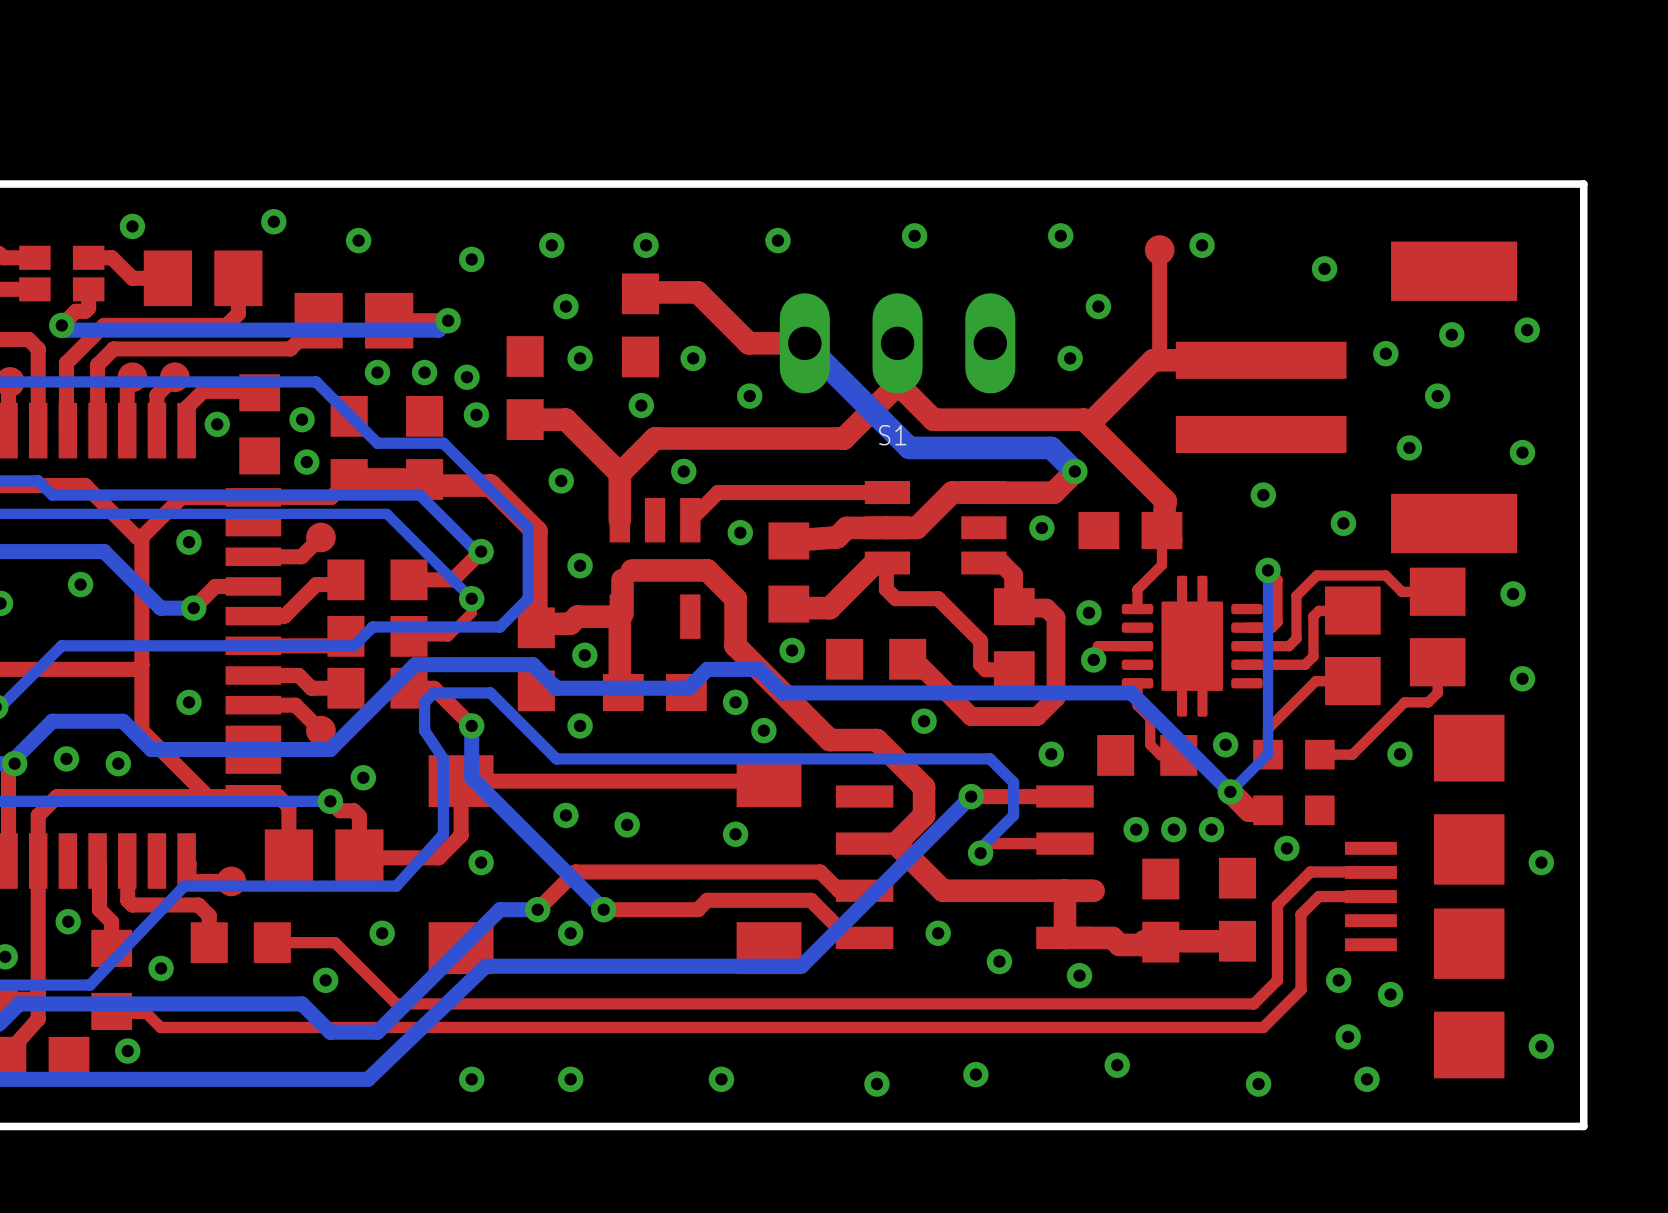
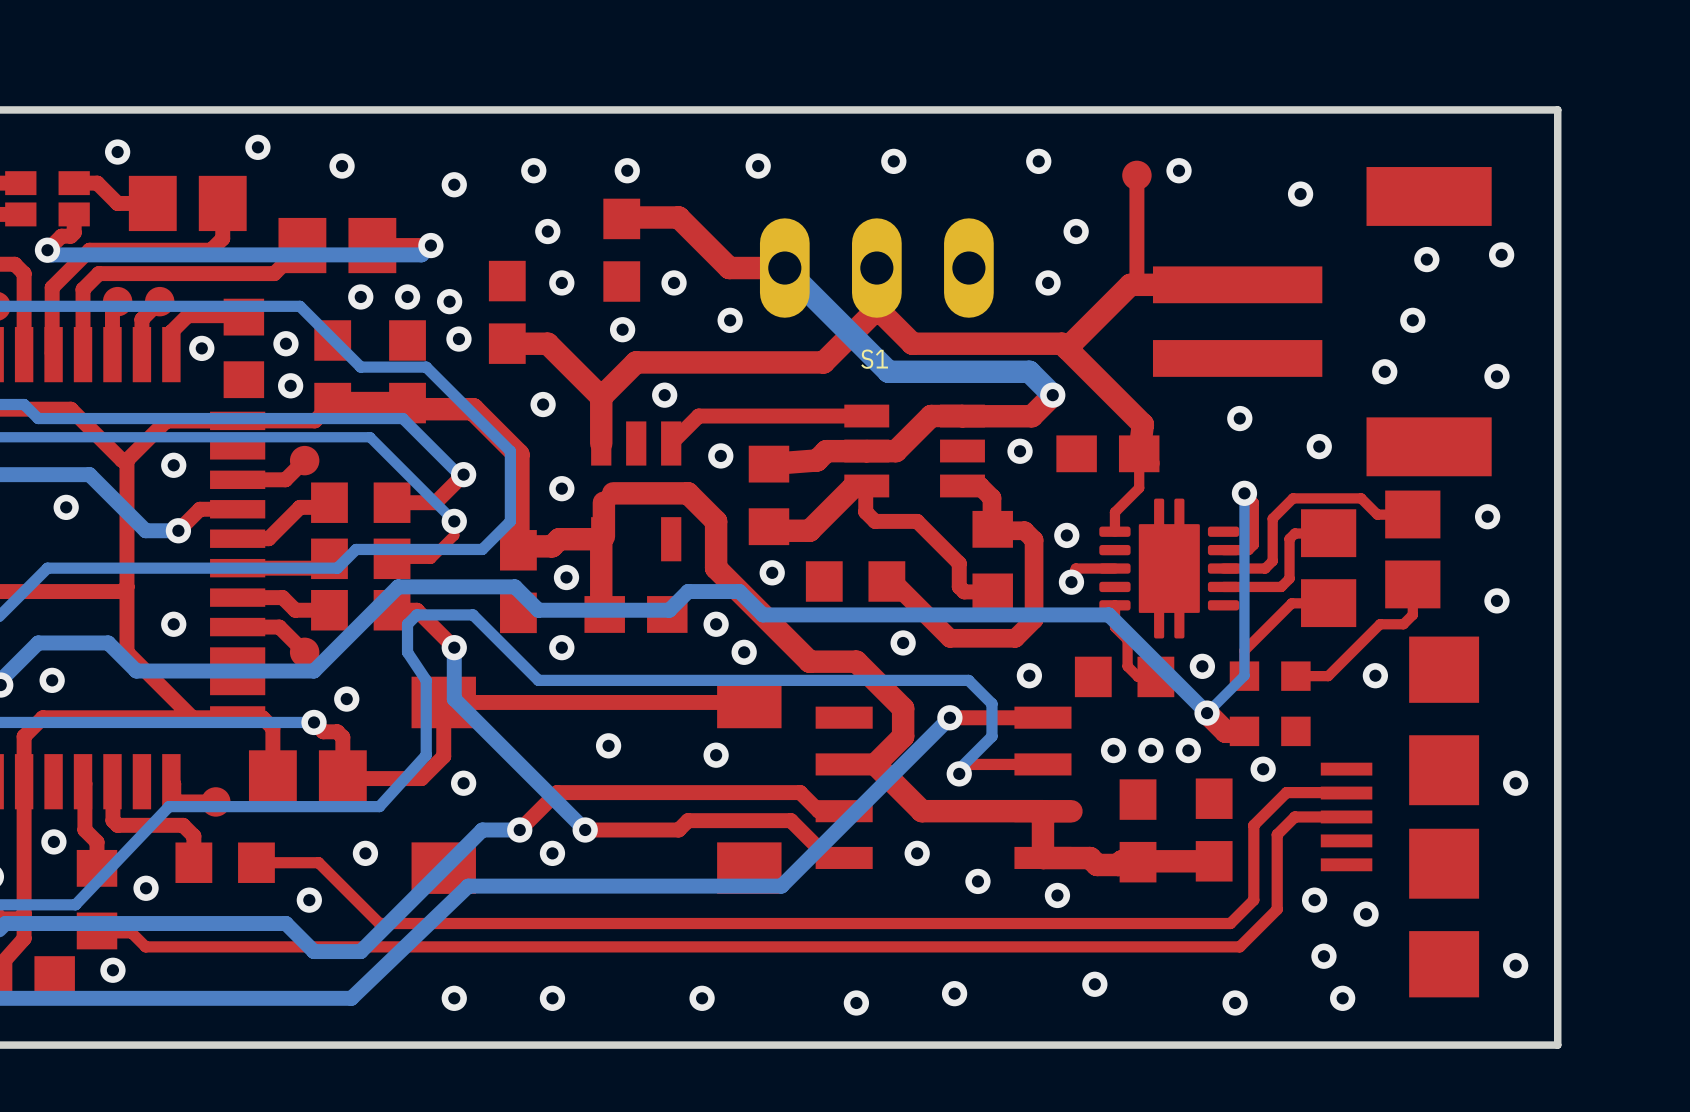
via: (1385, 353) -> none
via: (118, 763) -> none
via: (565, 815) -> none

